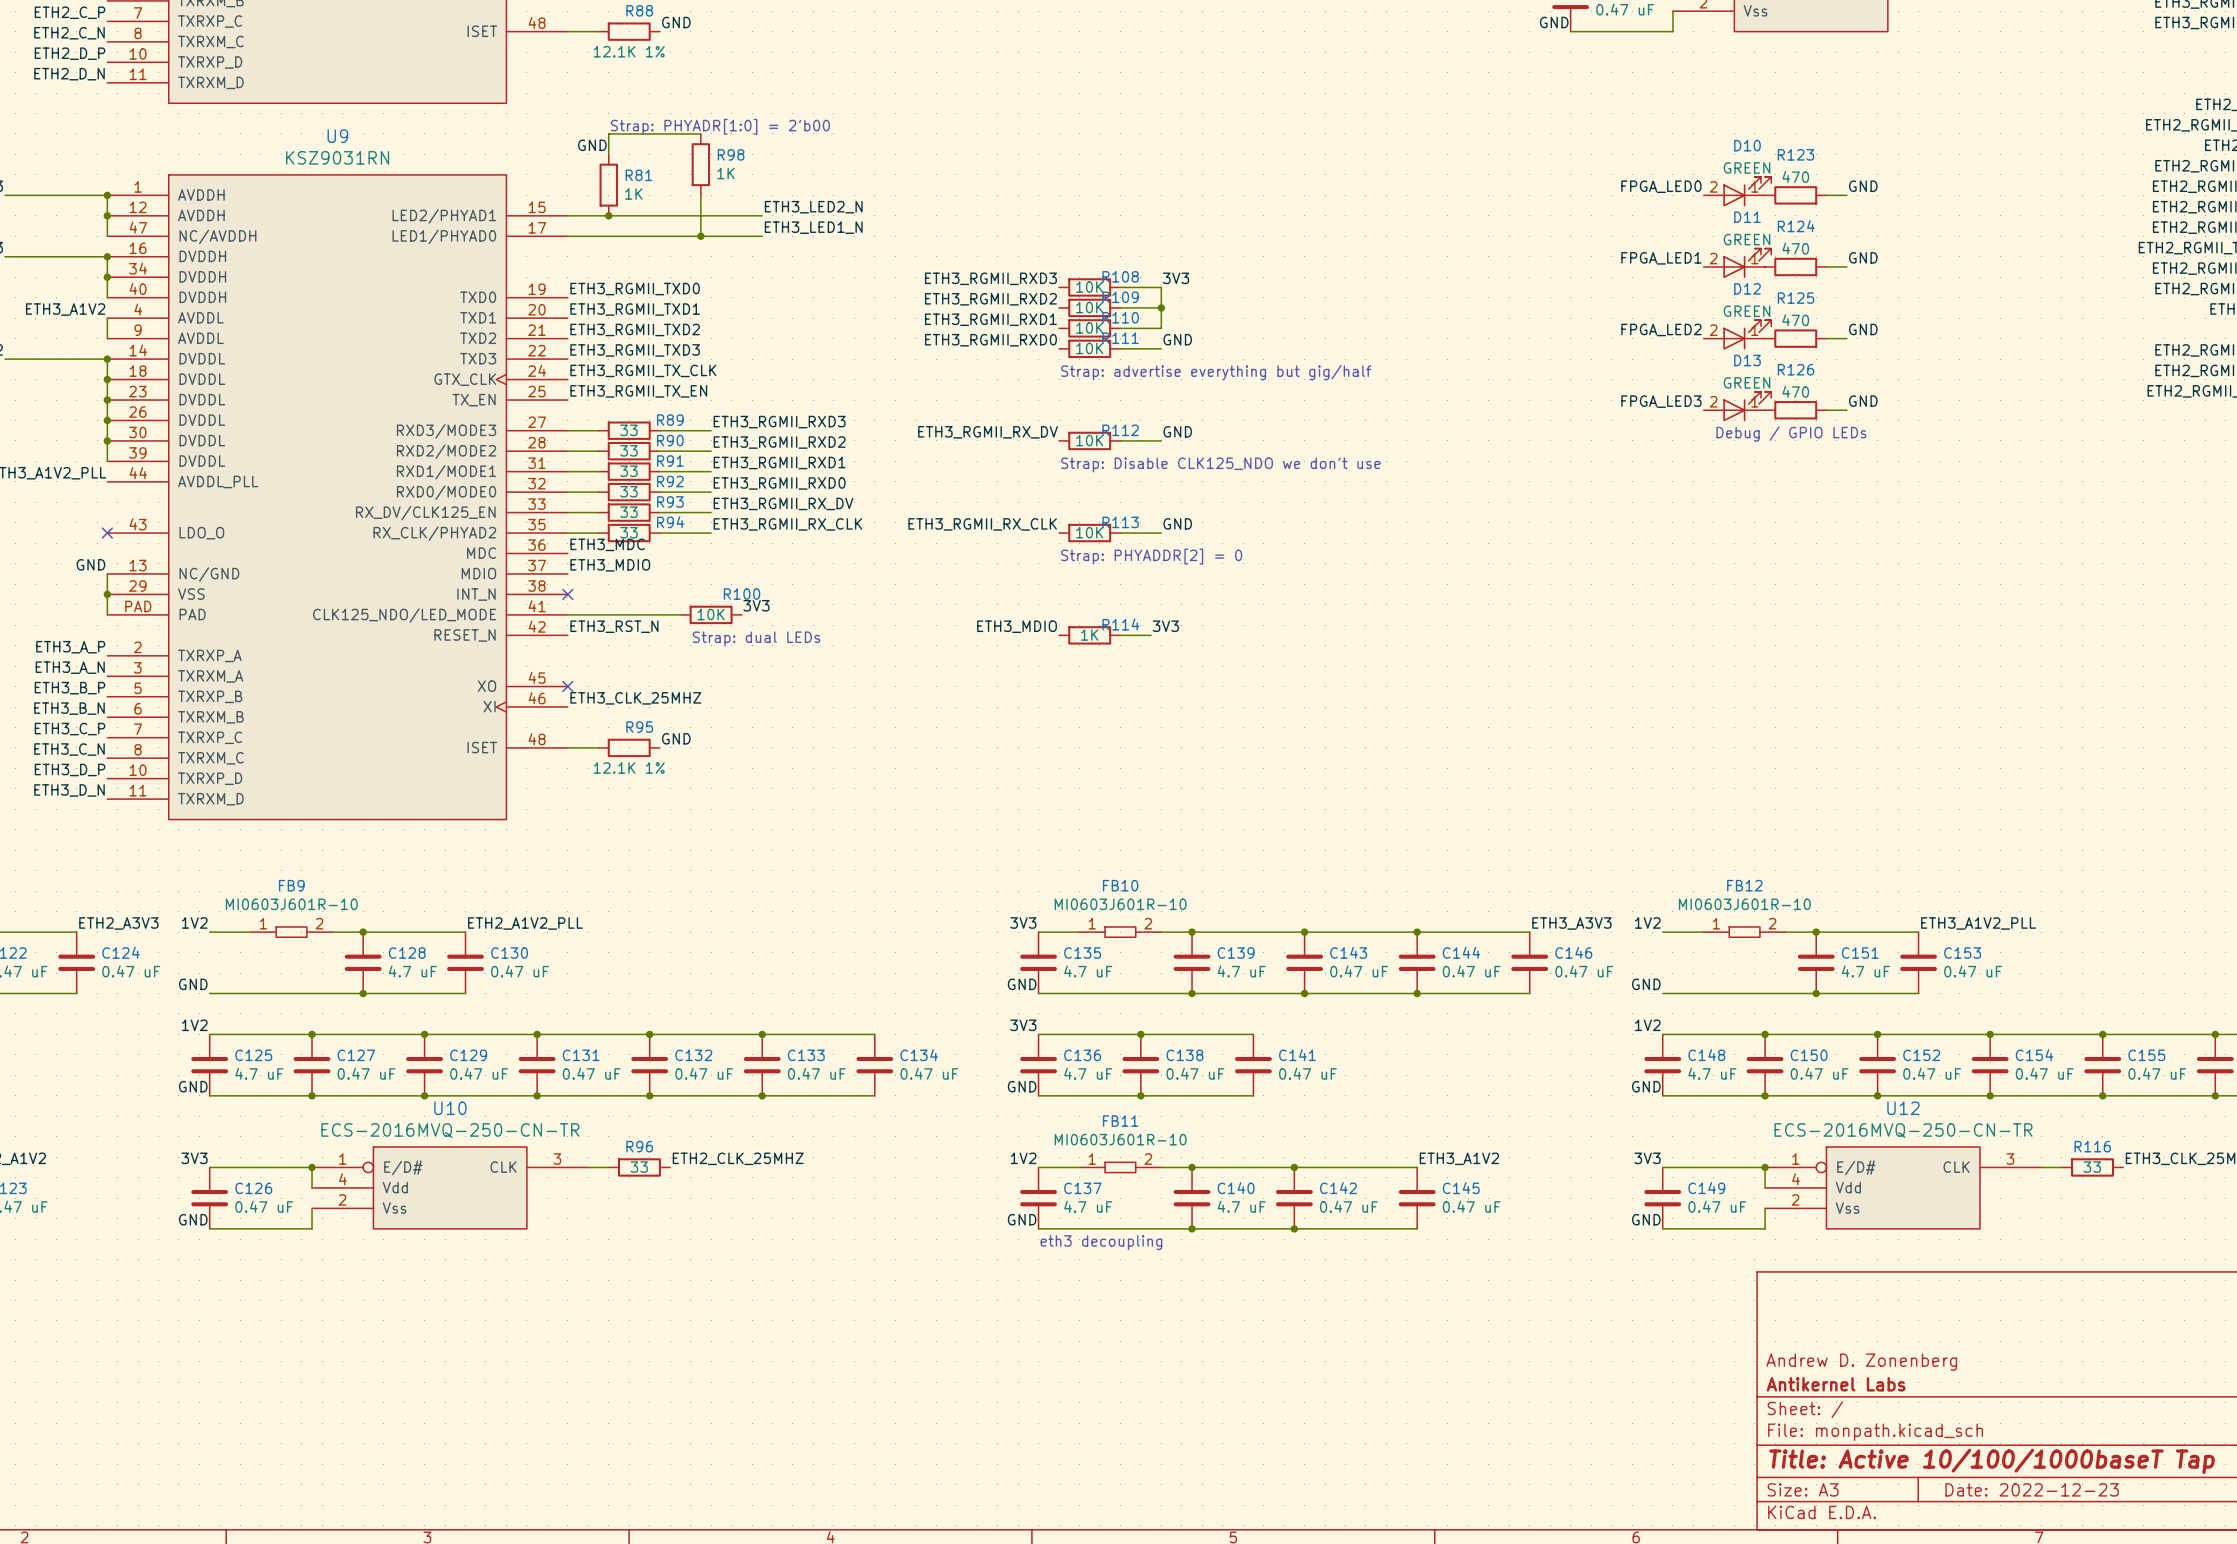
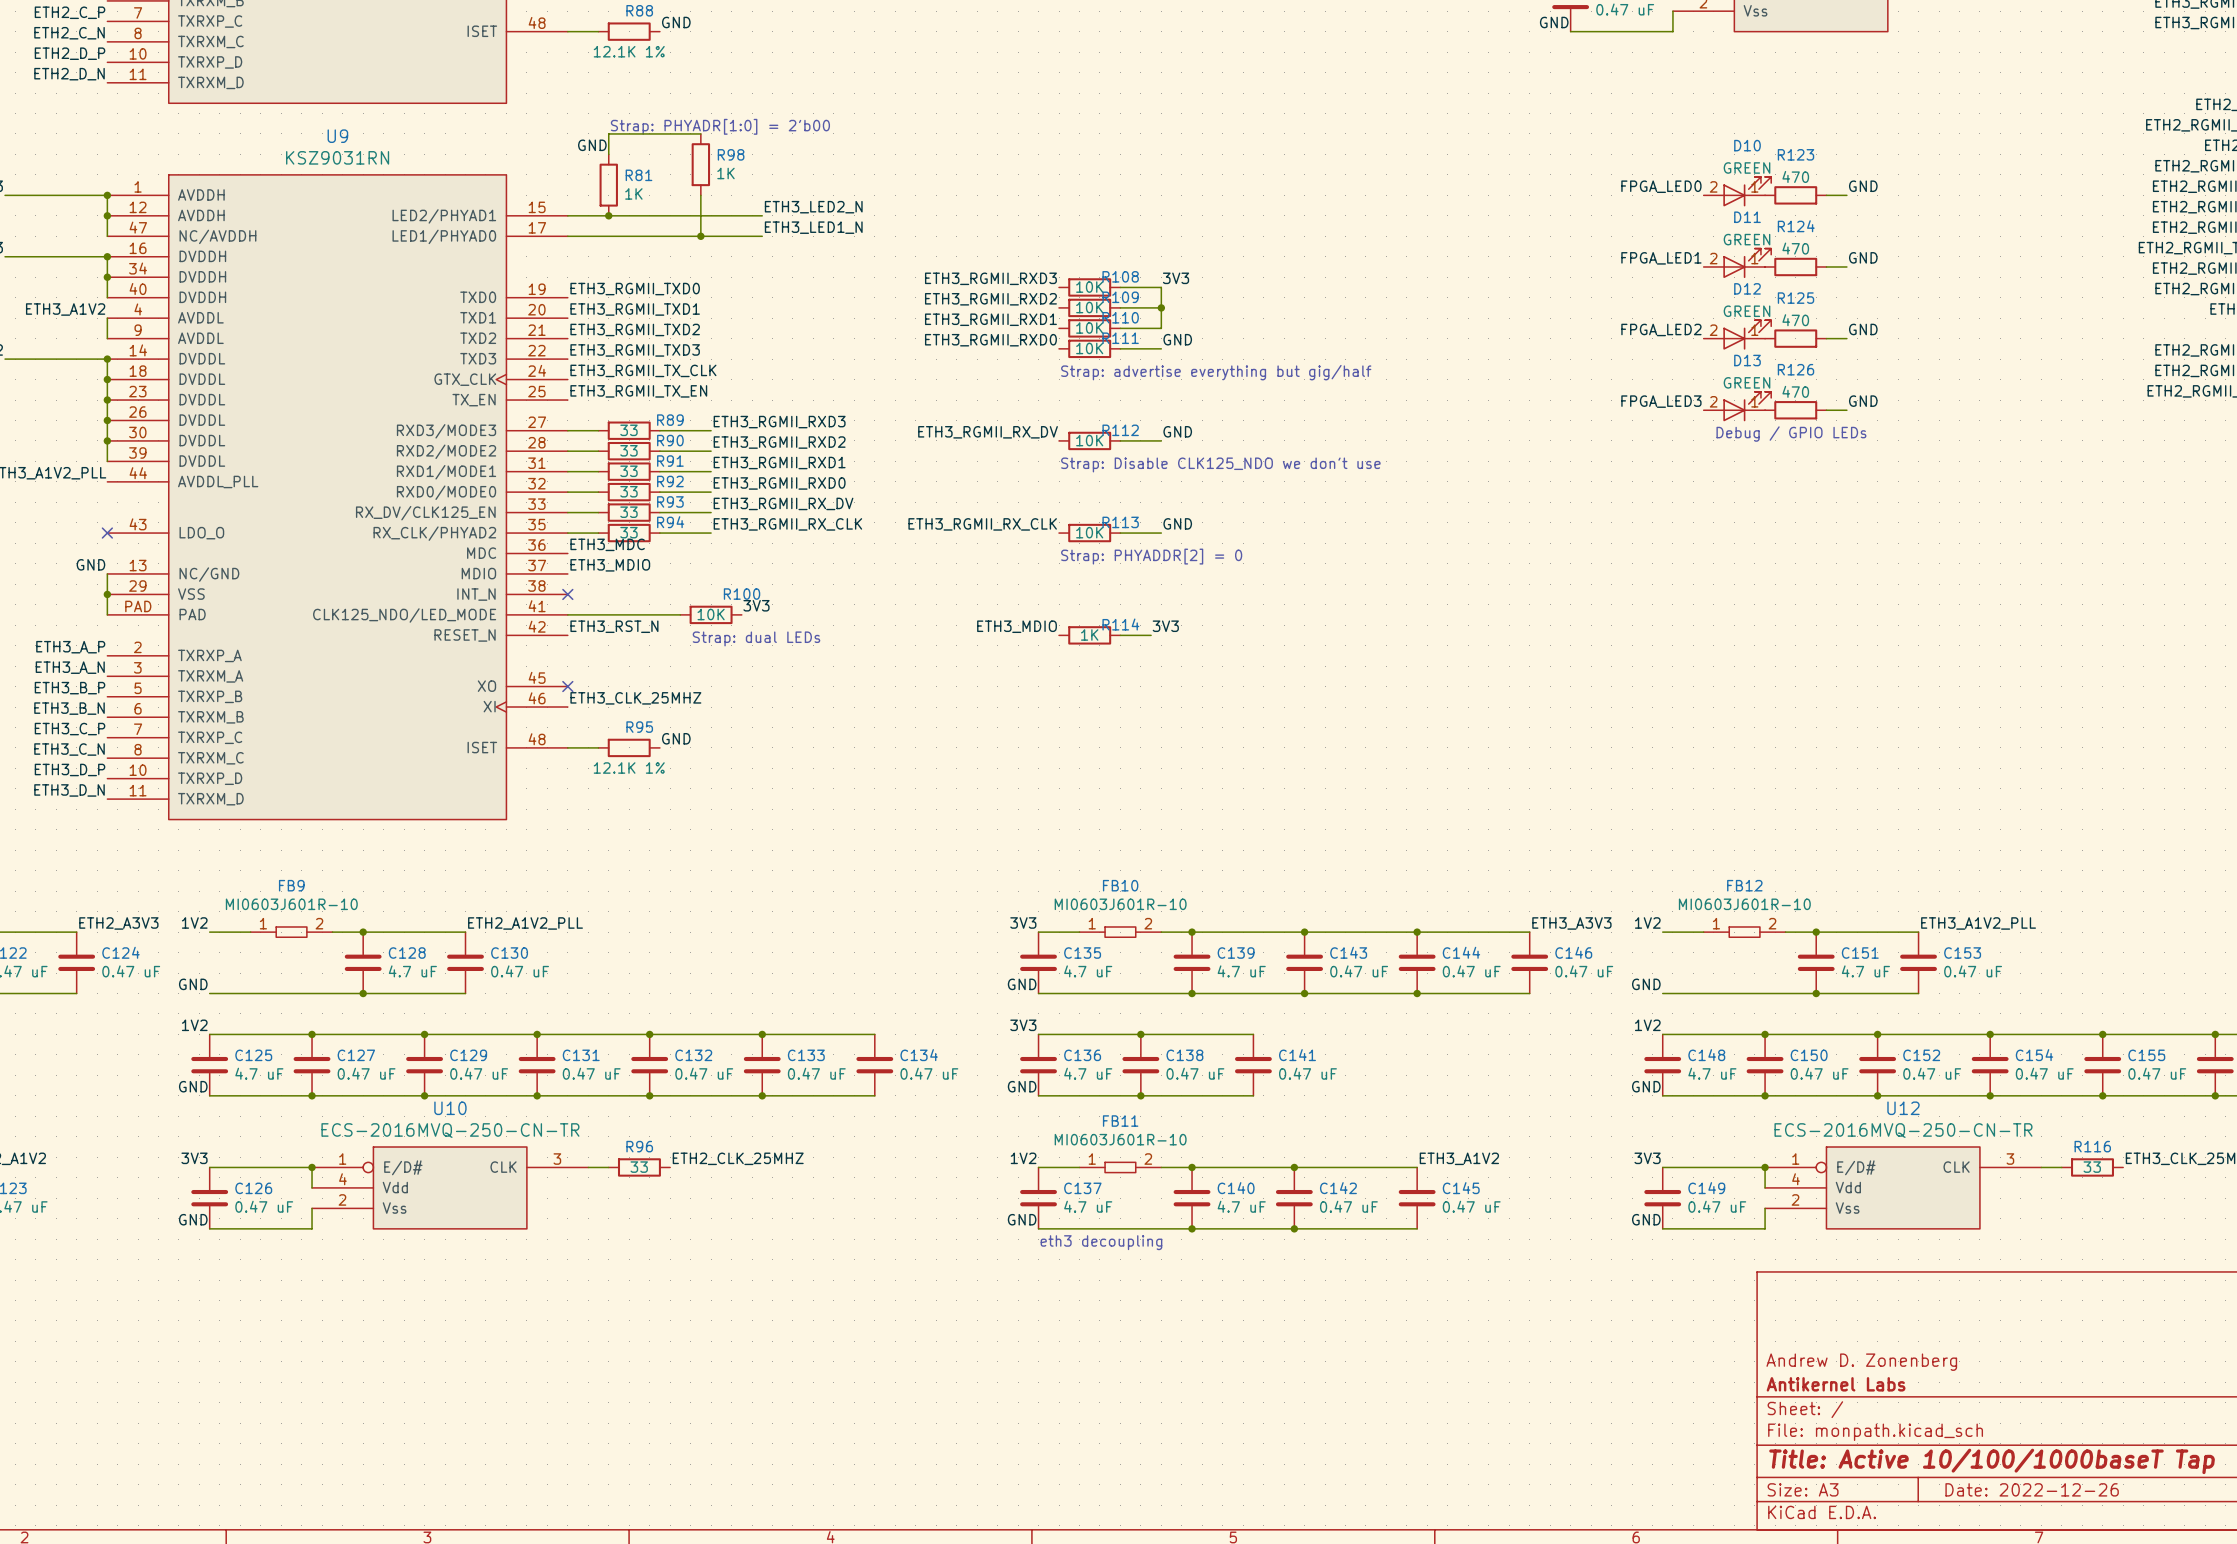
title block: Date: 2022-12-23 (2032, 1489) -> Date: 2022-12-26 (2032, 1489)

